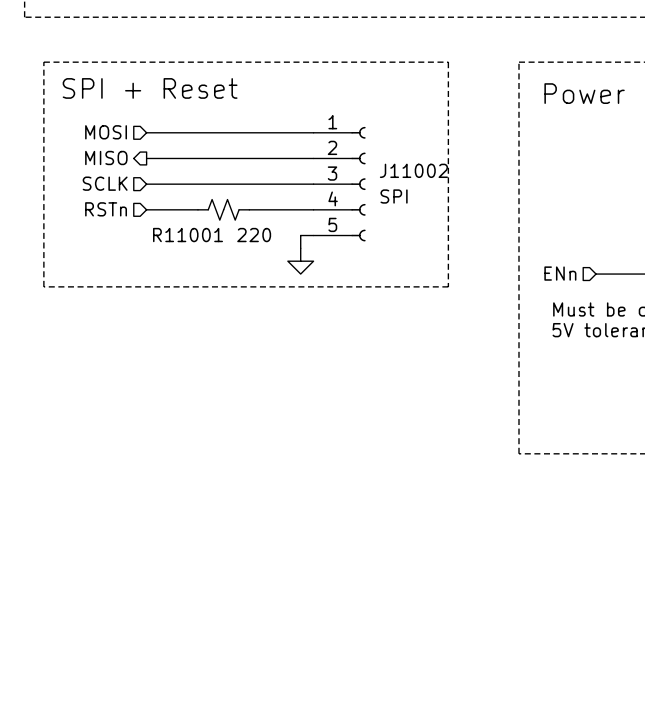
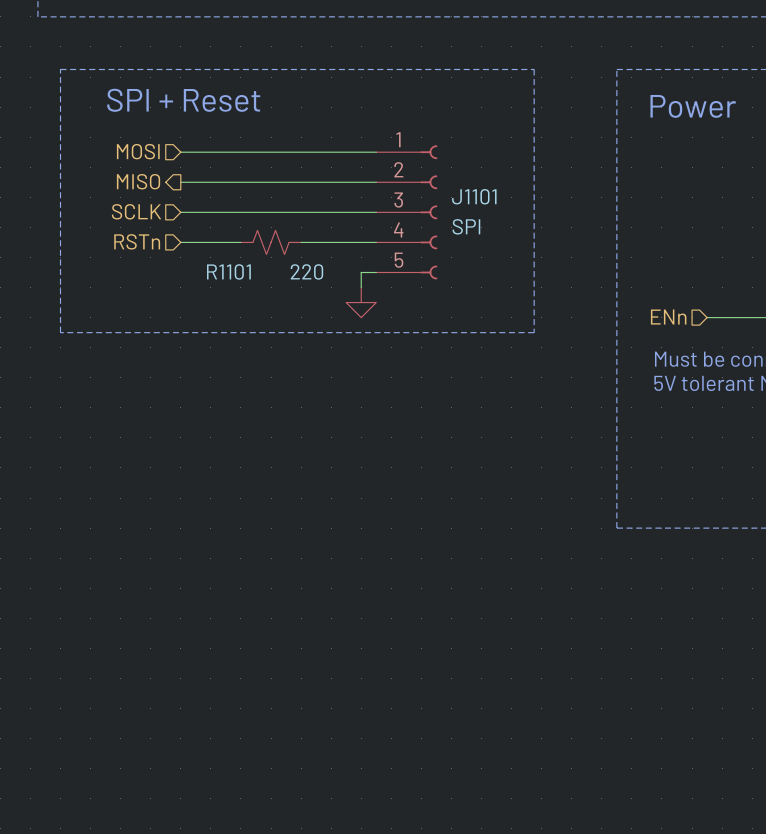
J11002 name: J11002 (413, 170) -> J1101 (474, 196)
R11001 name: R11001 (188, 235) -> R1101 (228, 271)

